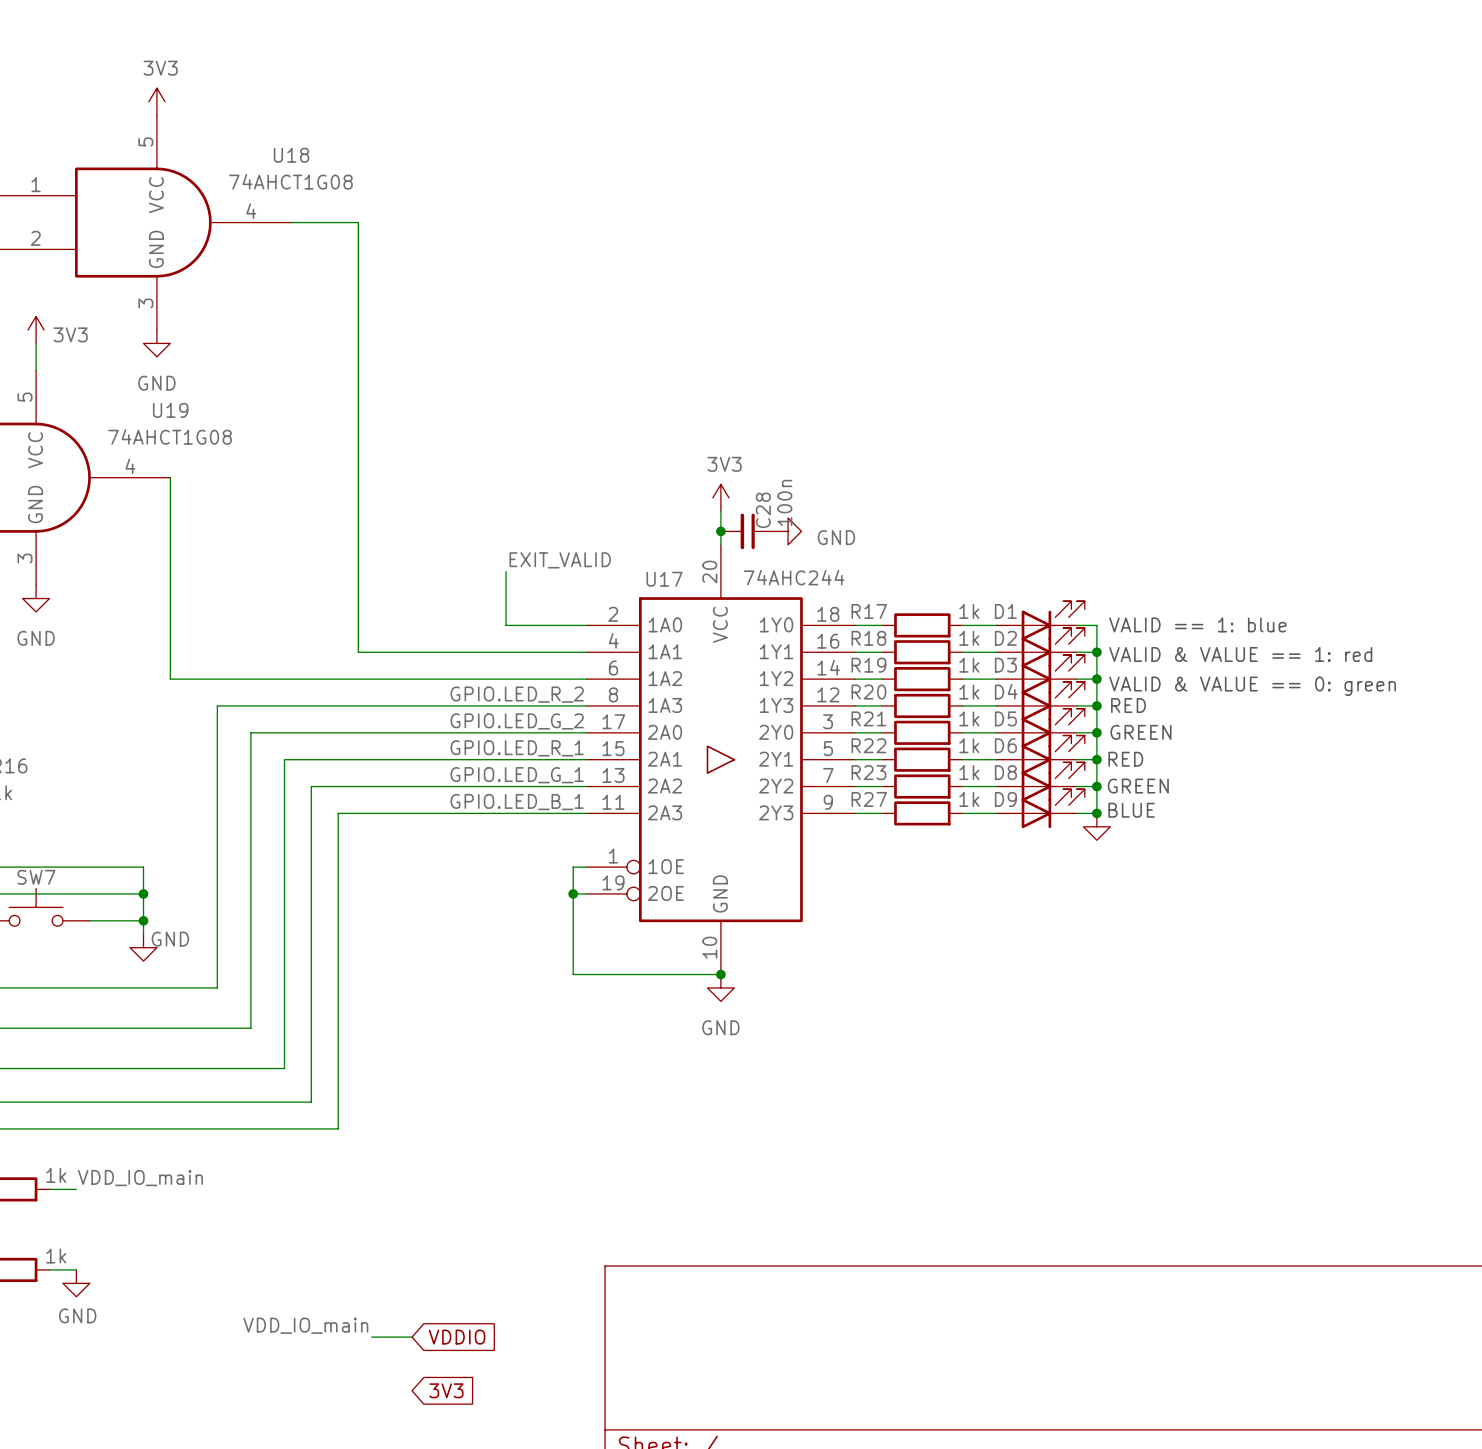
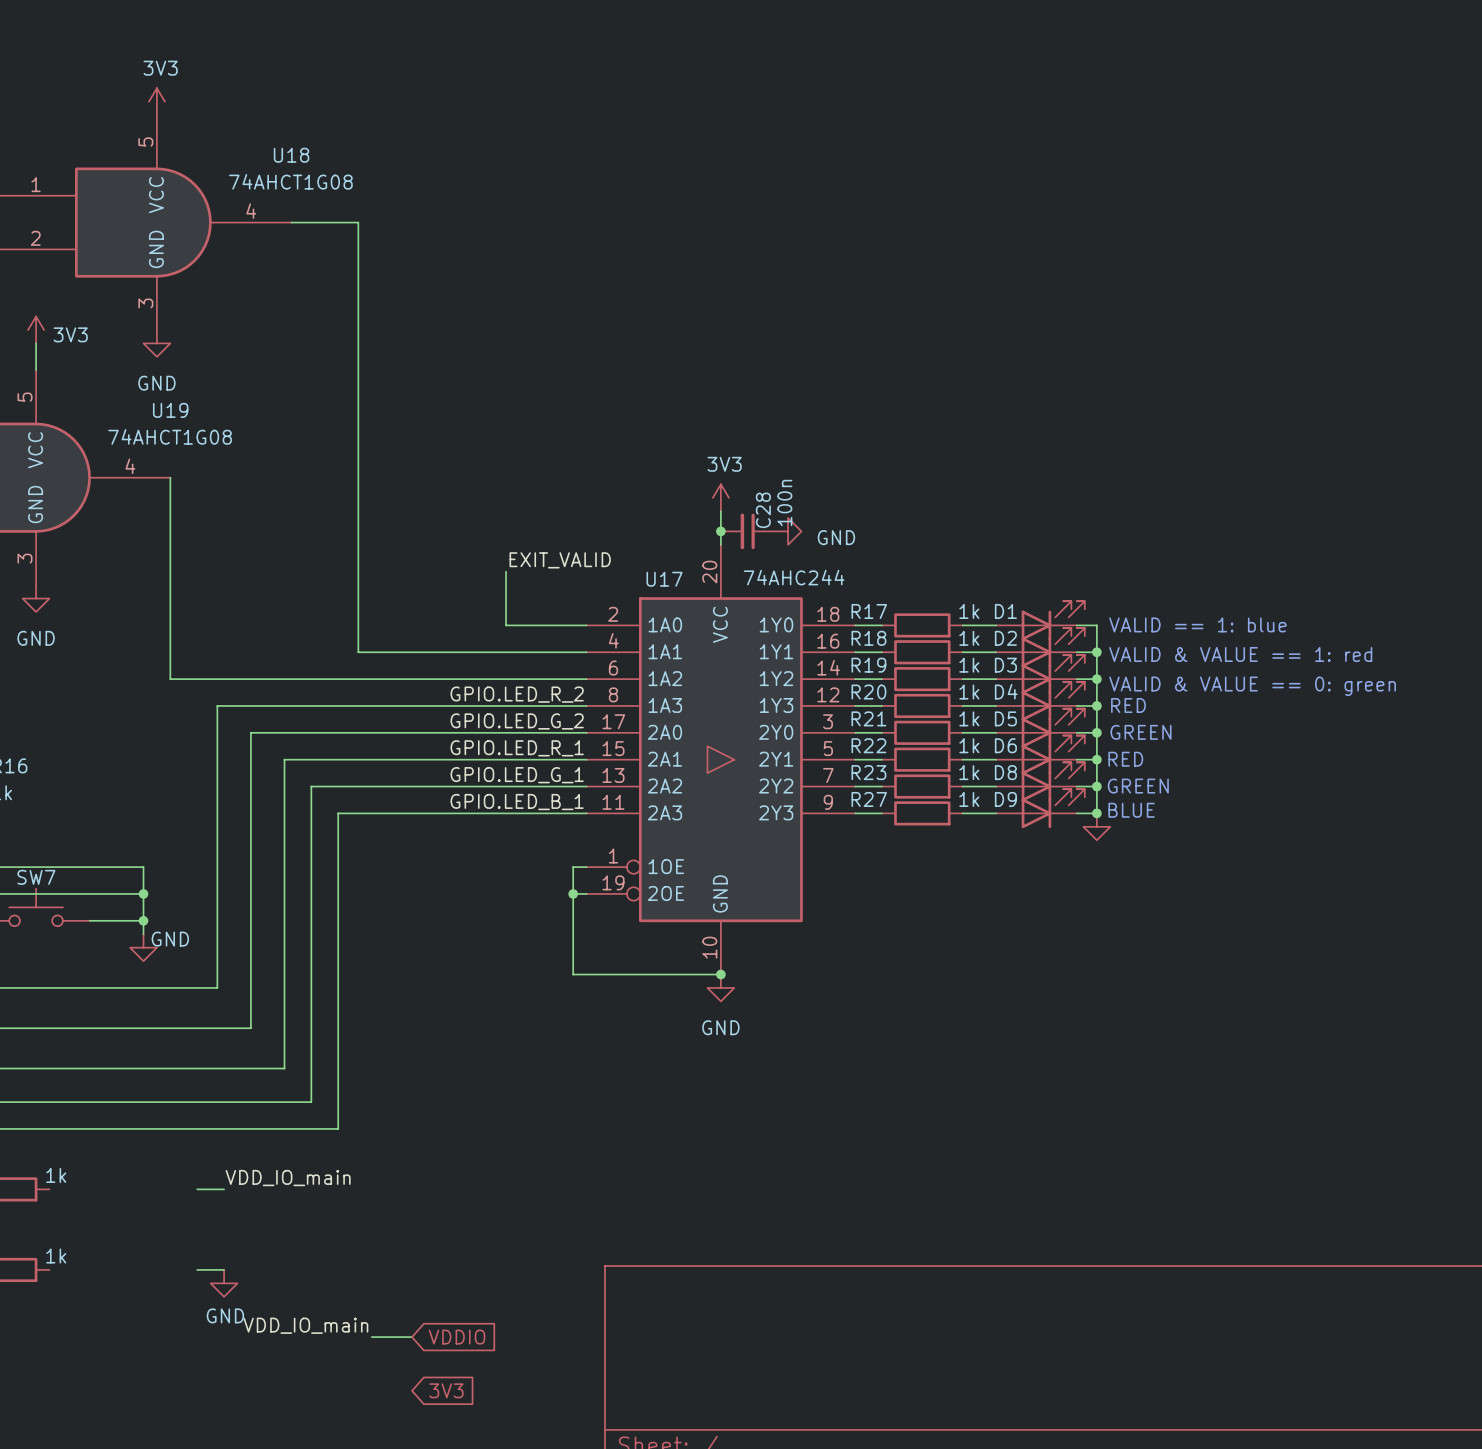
label position: VDD_IO_main (140, 1178) -> VDD_IO_main (288, 1178)
wire: (49, 1189) (76, 1189) -> (197, 1189) (224, 1189)
wire: (49, 1269) (76, 1269) -> (197, 1269) (224, 1269)
power symbol position: GND (76, 1283) -> GND (224, 1283)

